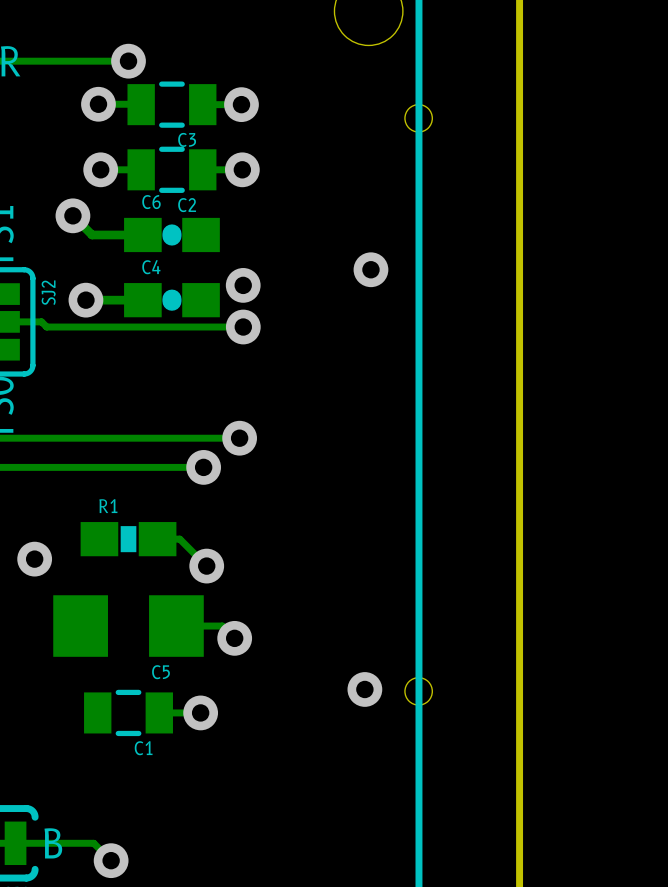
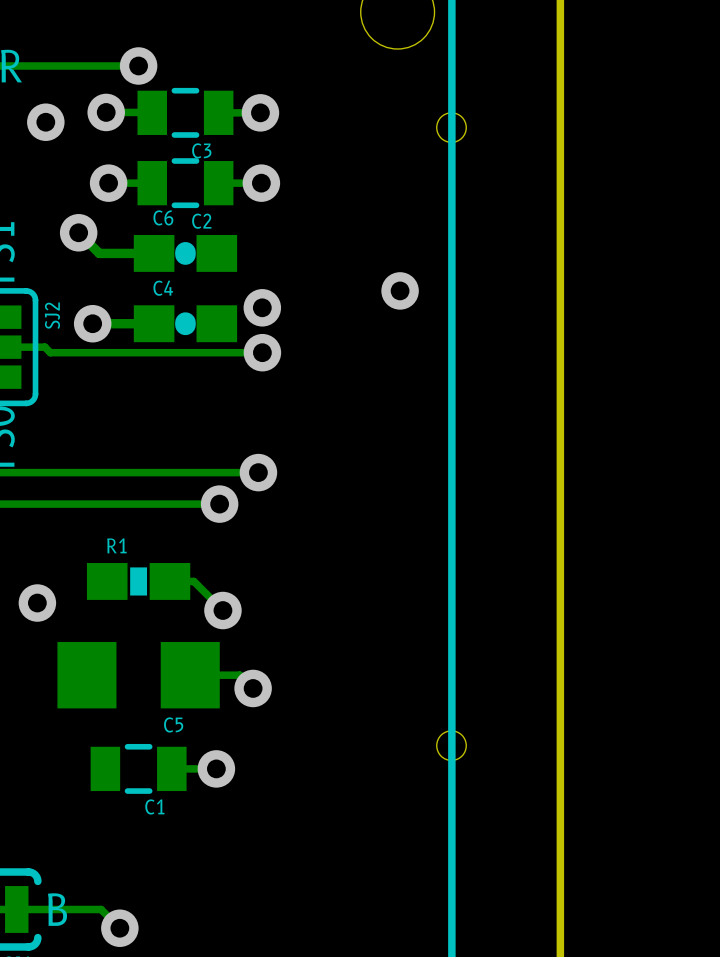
via: none -> (45, 122)
via: (364, 689) -> none

